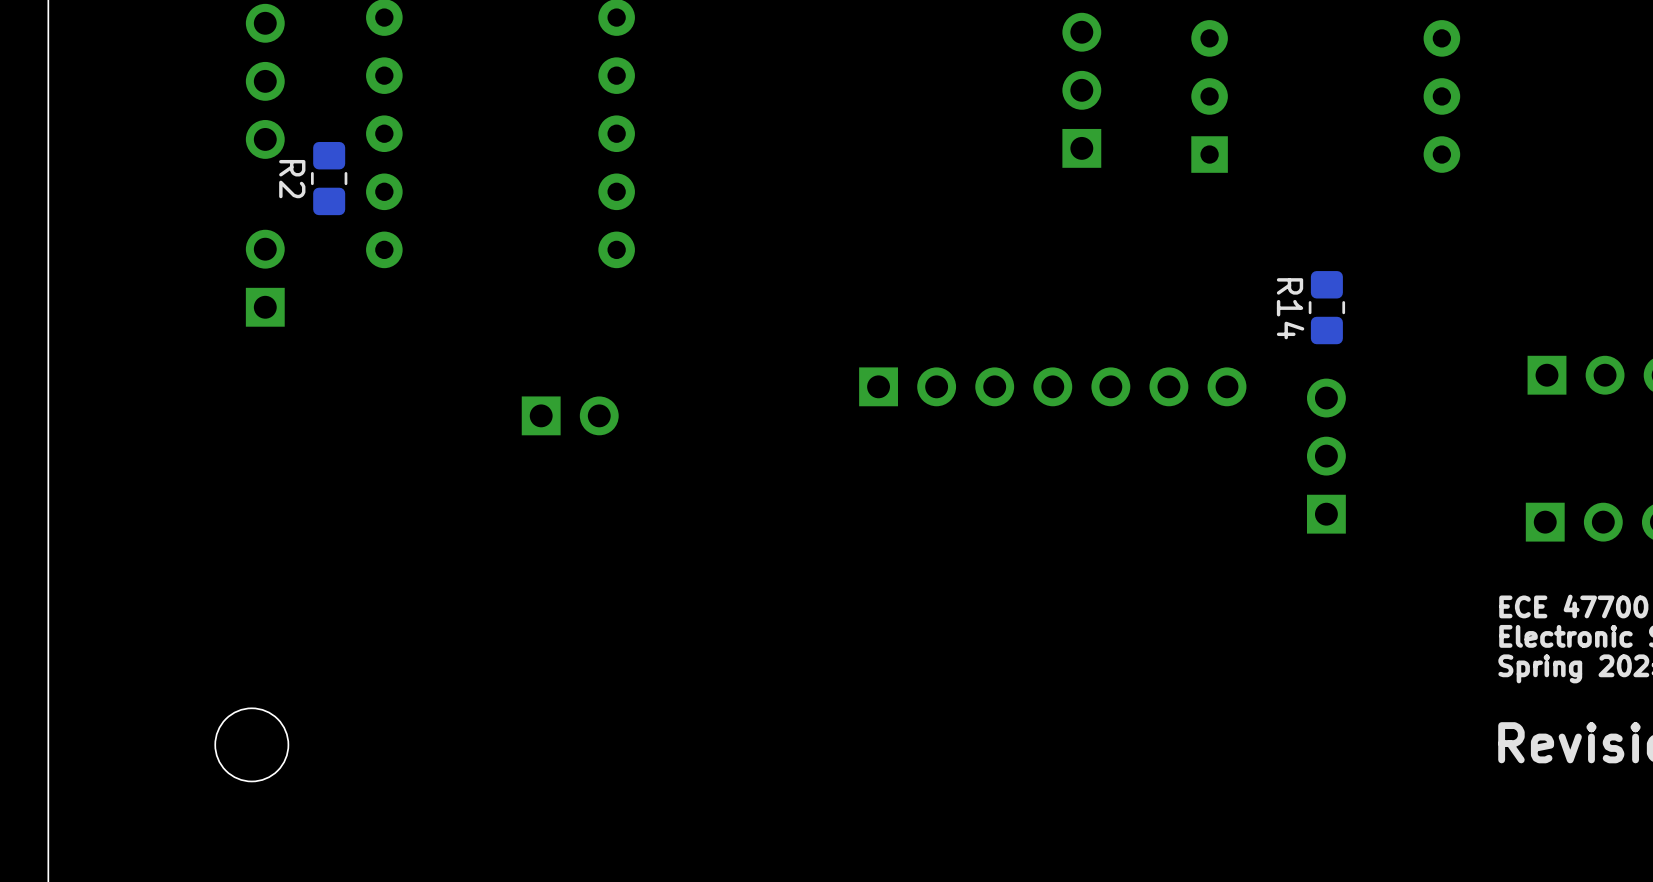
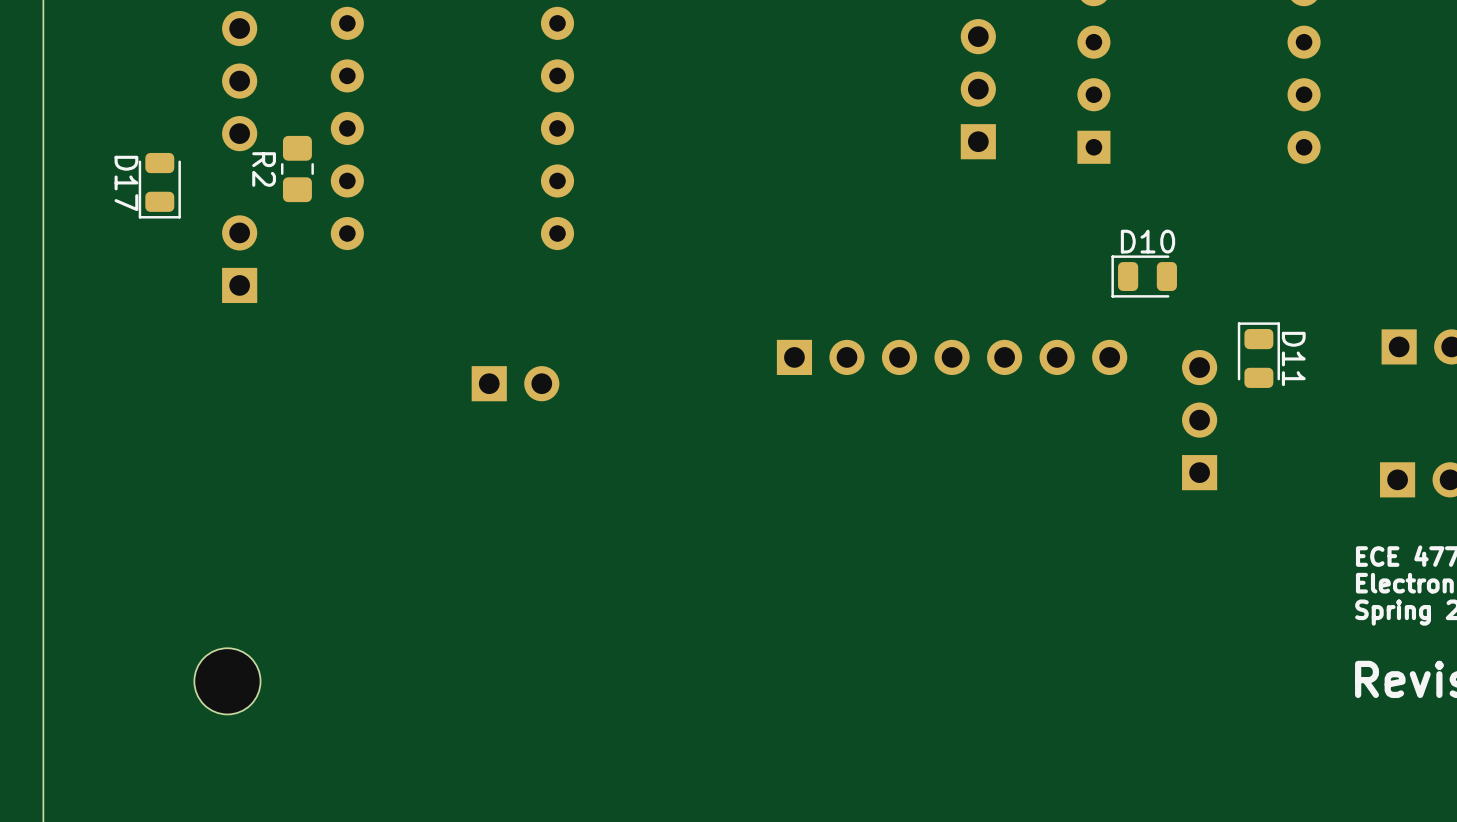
D17: none -> (159, 185)
D10: none -> (1144, 276)
R14: (1326, 307) -> none
D11: none -> (1258, 355)

